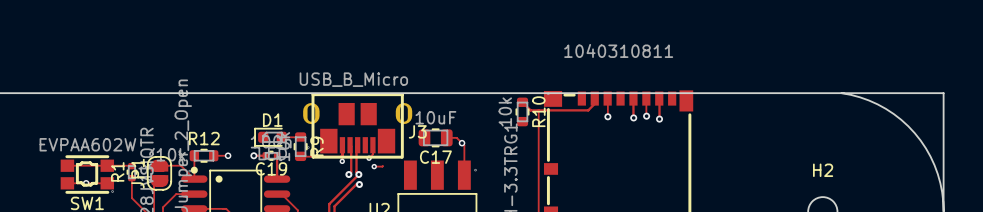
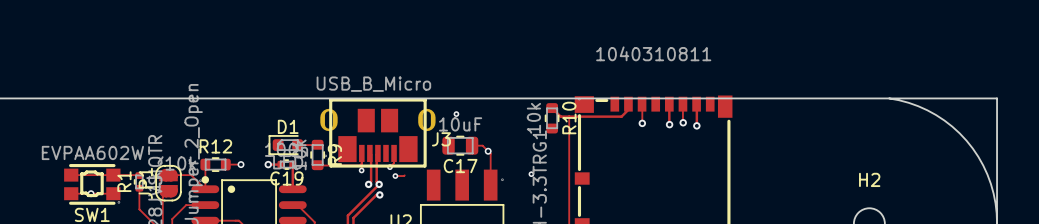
via: none -> (456, 114)
via: none -> (531, 174)

